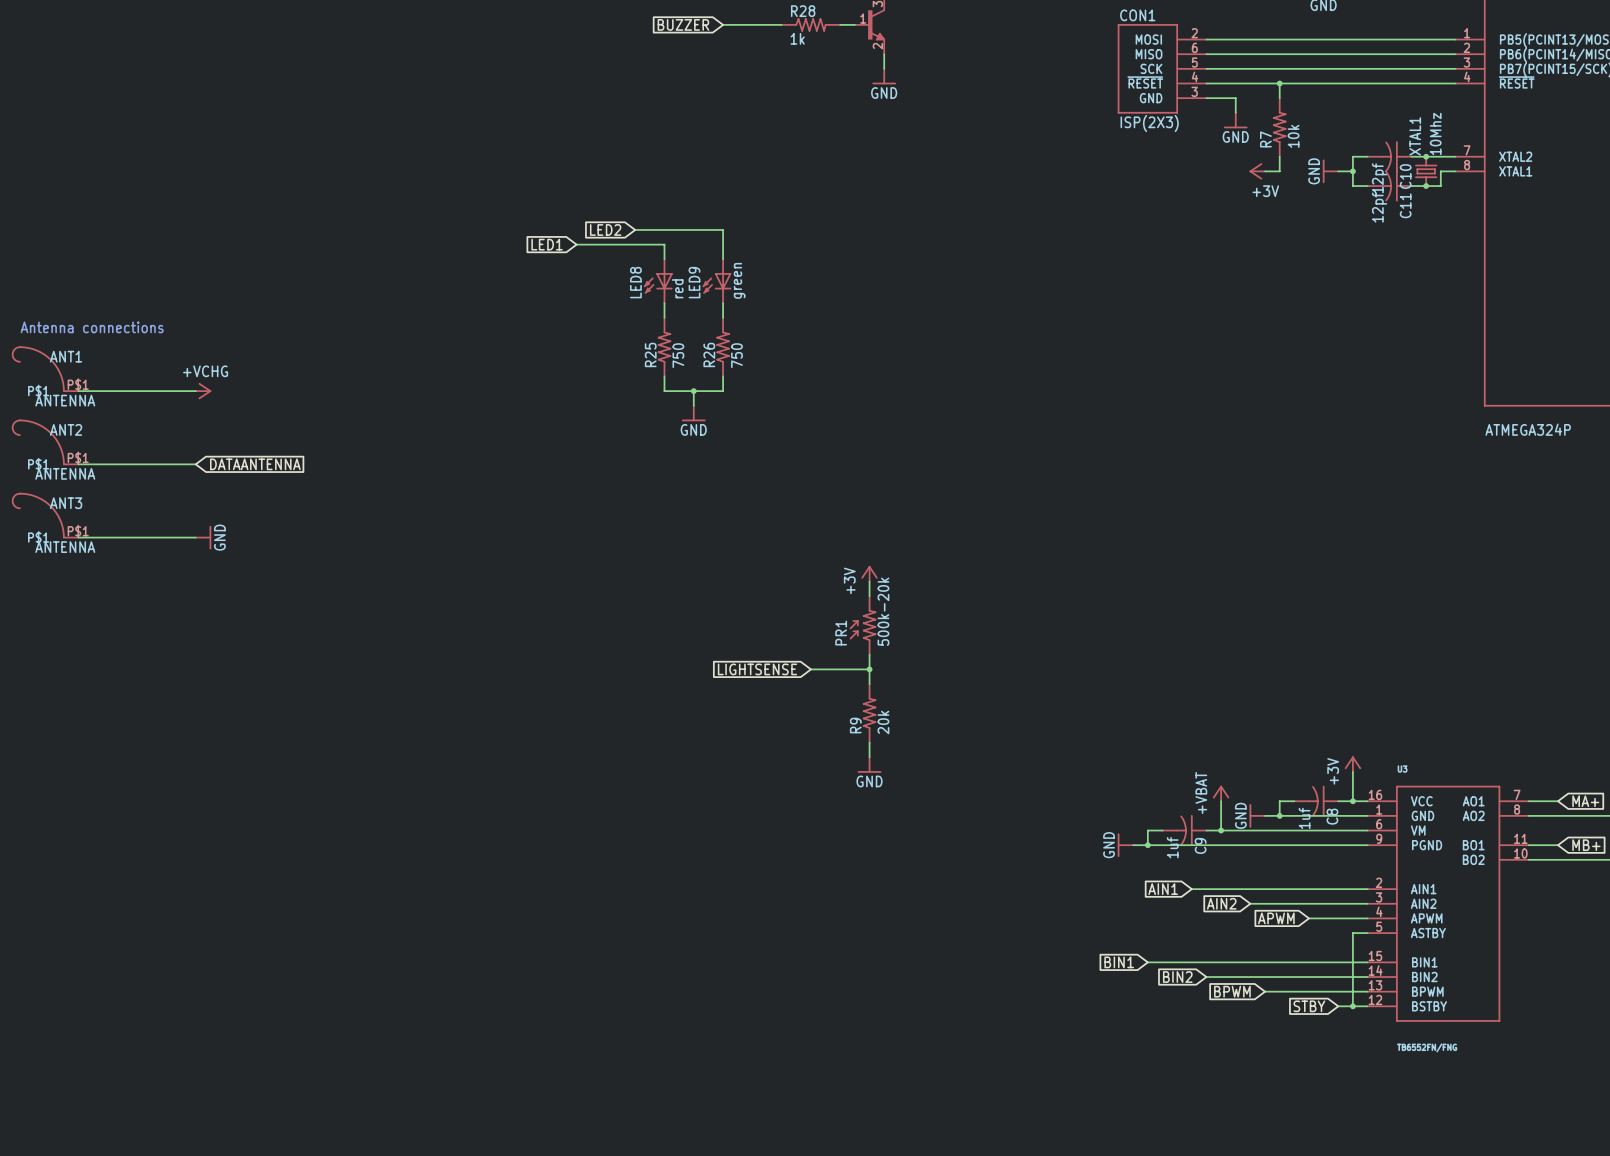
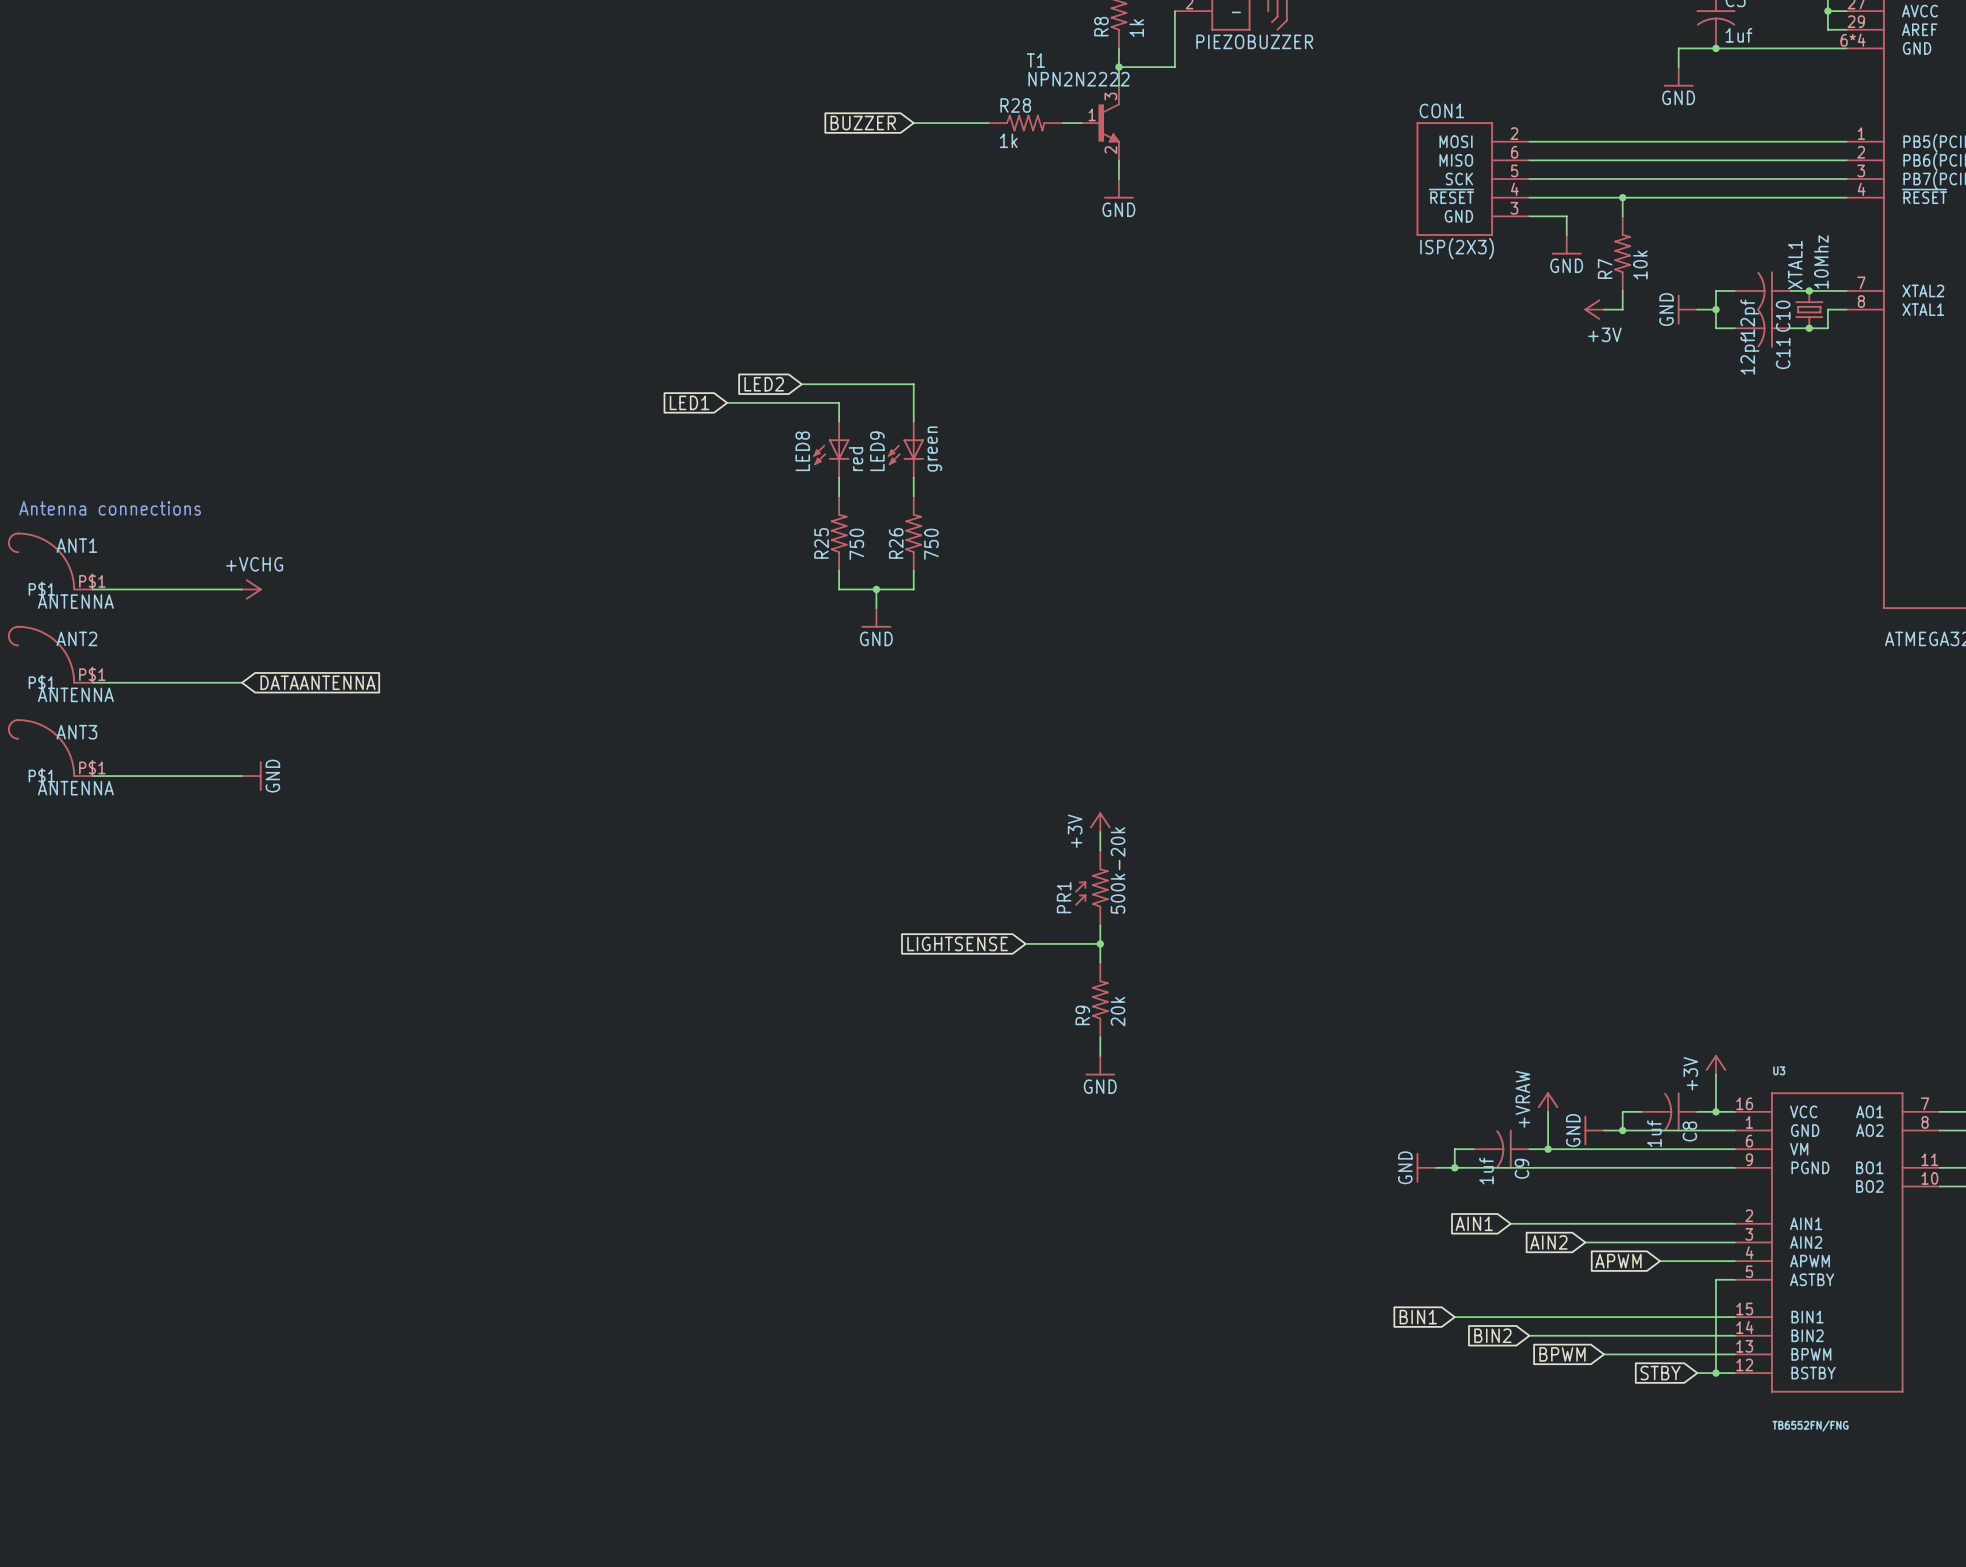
power symbol: +VBAT (1221, 793) -> +VRAW (1548, 1102)

